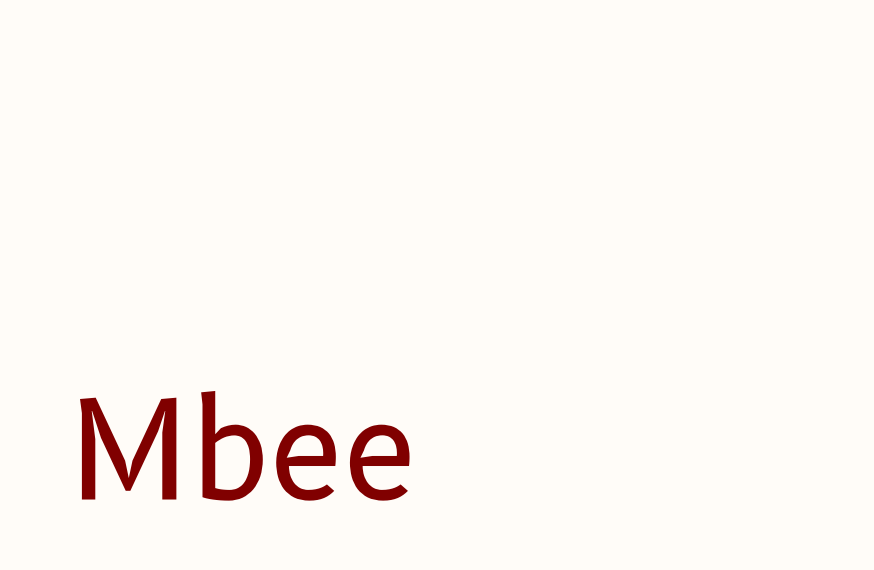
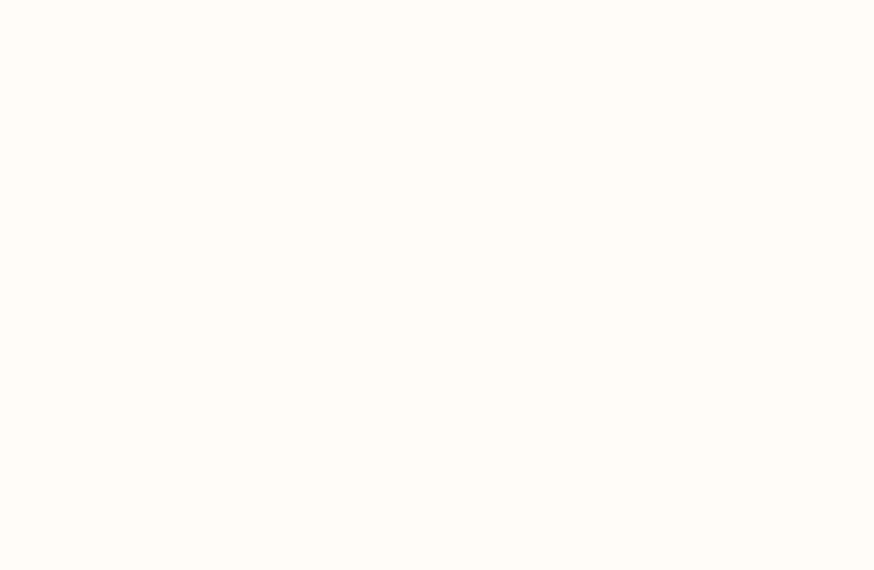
label: Mbee (244, 445) -> none

